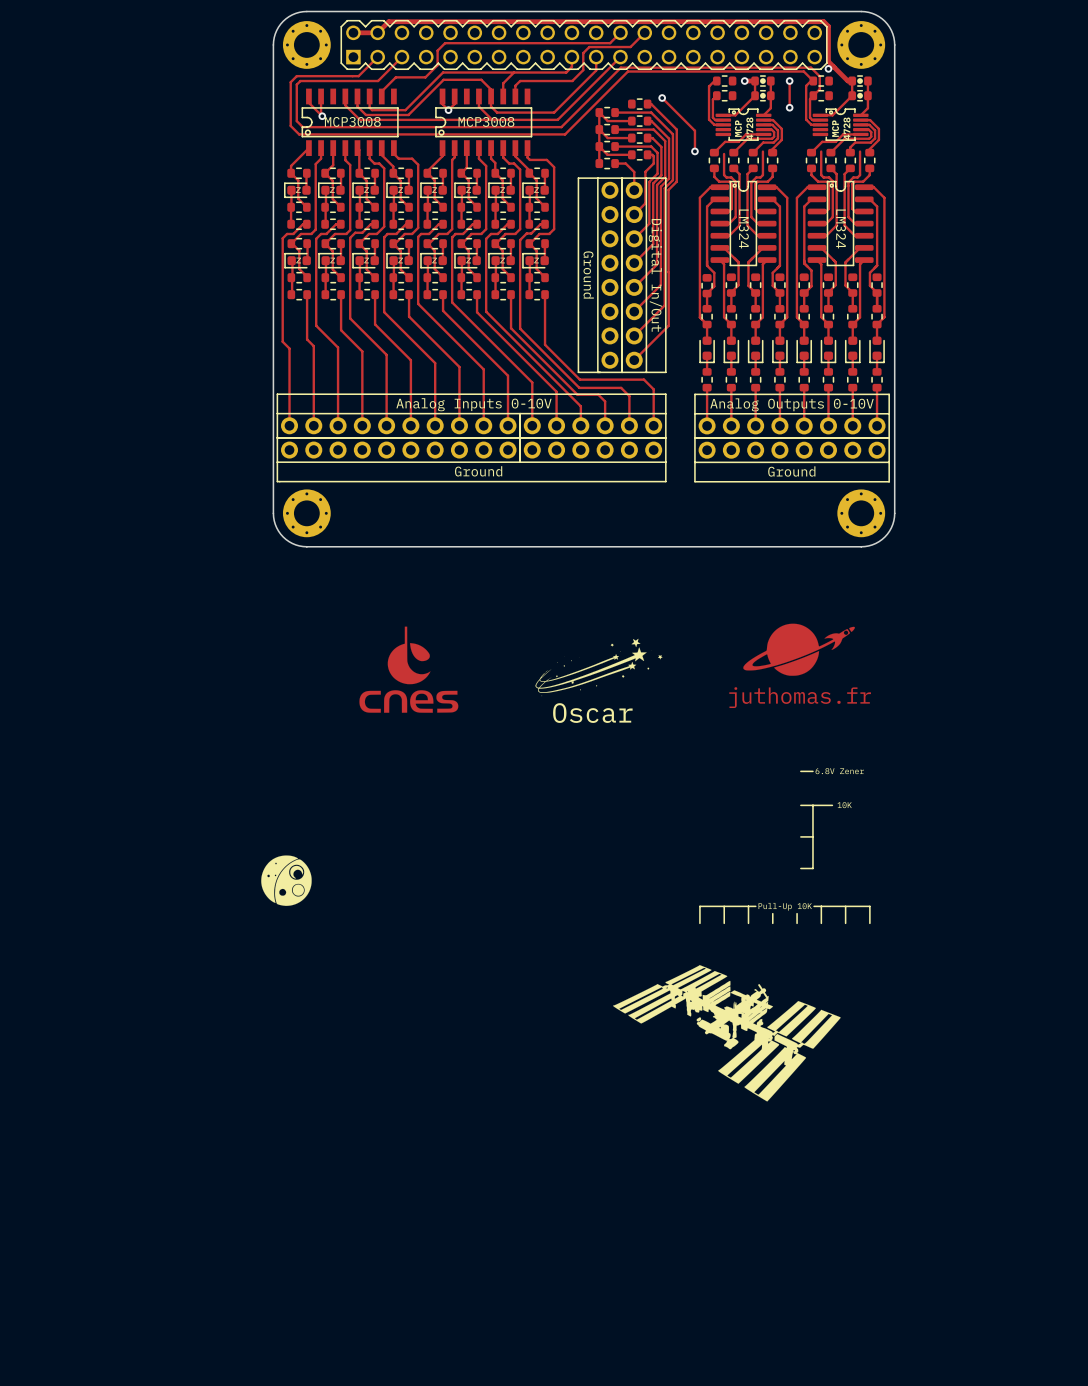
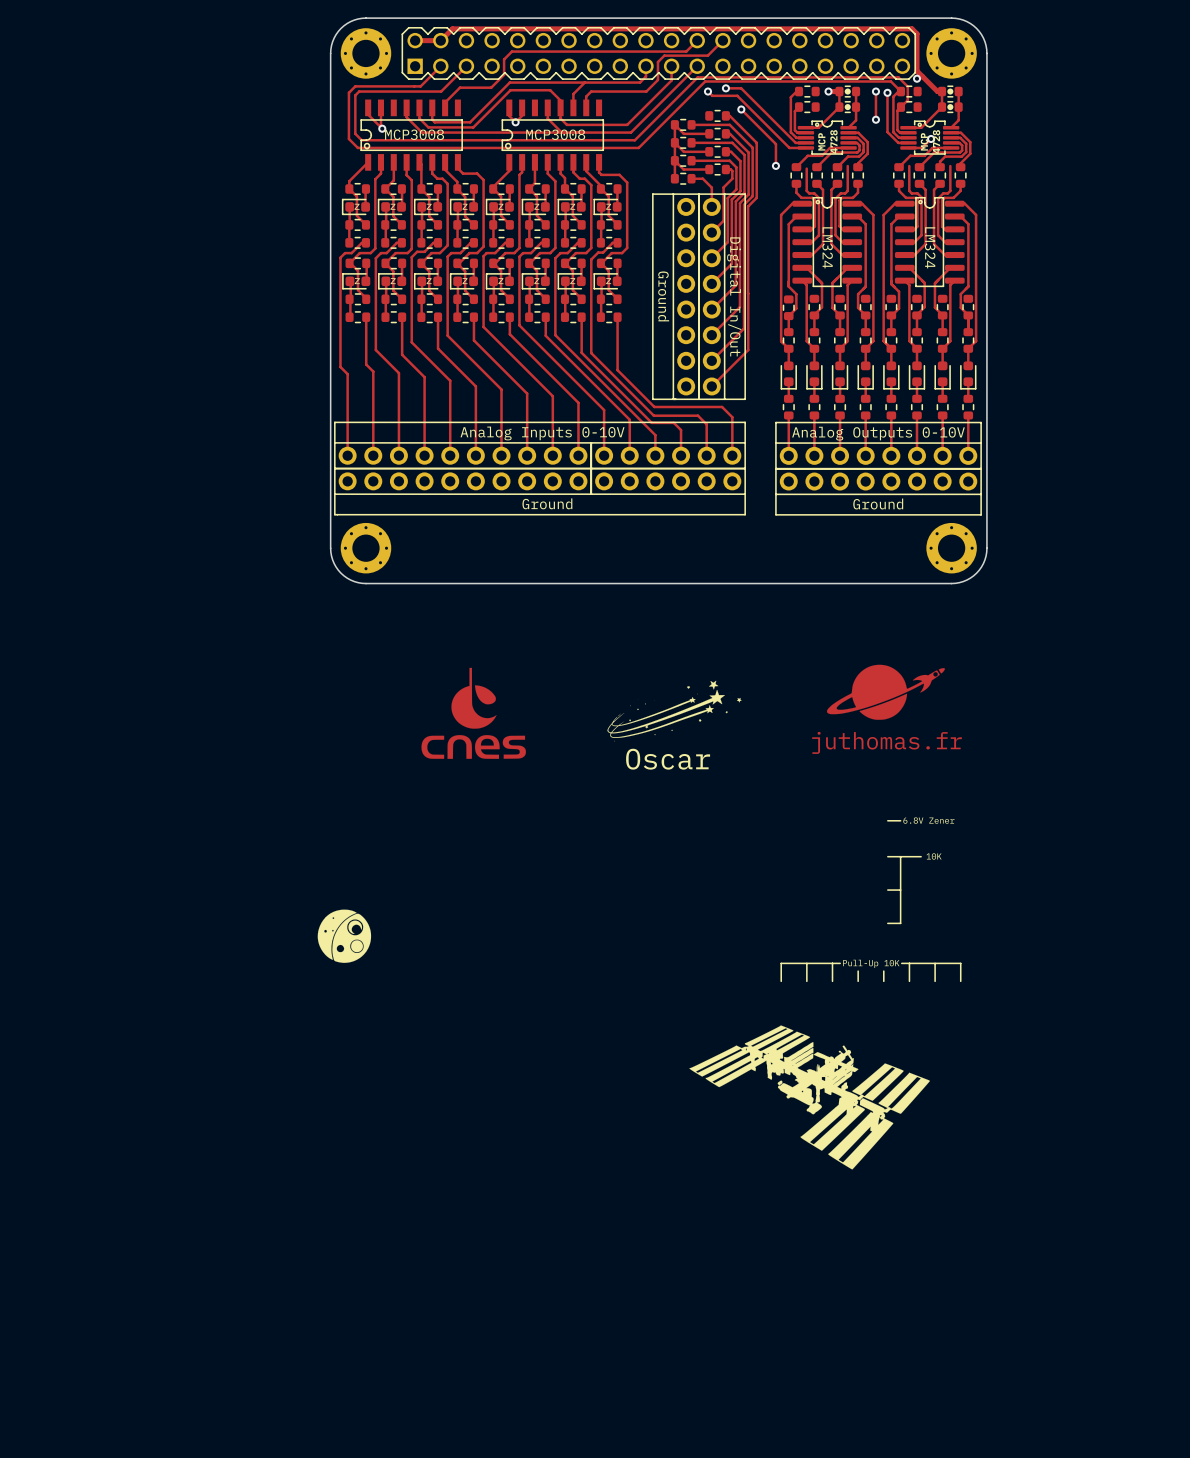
track: none -> (725, 88) (741, 88) (795, 142) (805, 142)
via: none -> (725, 88)
track: none -> (707, 91) (712, 95) (737, 95) (789, 147) (805, 147)
via: none -> (707, 91)
track: none -> (887, 92) (887, 132) (898, 142) (908, 142)
via: none -> (887, 92)
track: none -> (931, 138) (922, 147) (908, 147)
via: none -> (931, 138)

